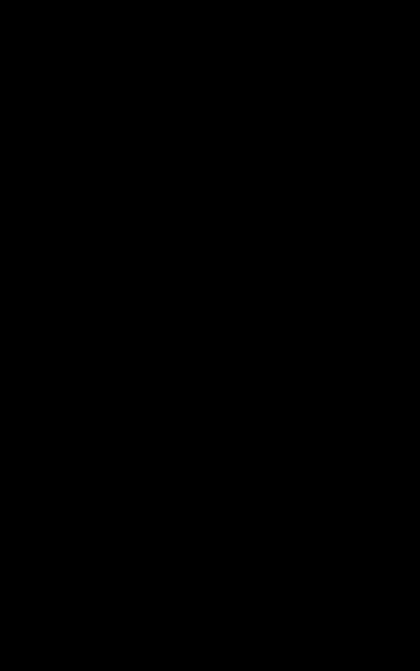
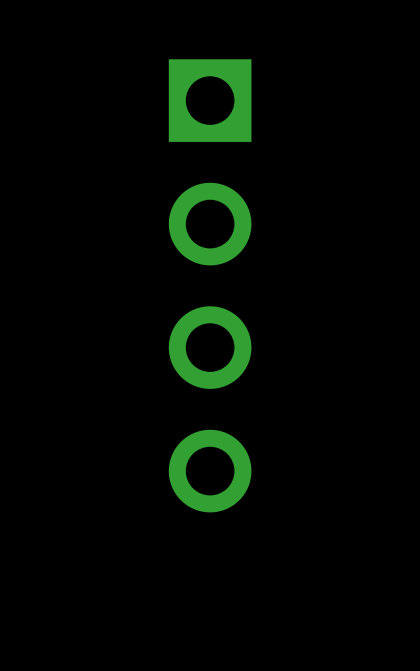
part: none -> (210, 285)

